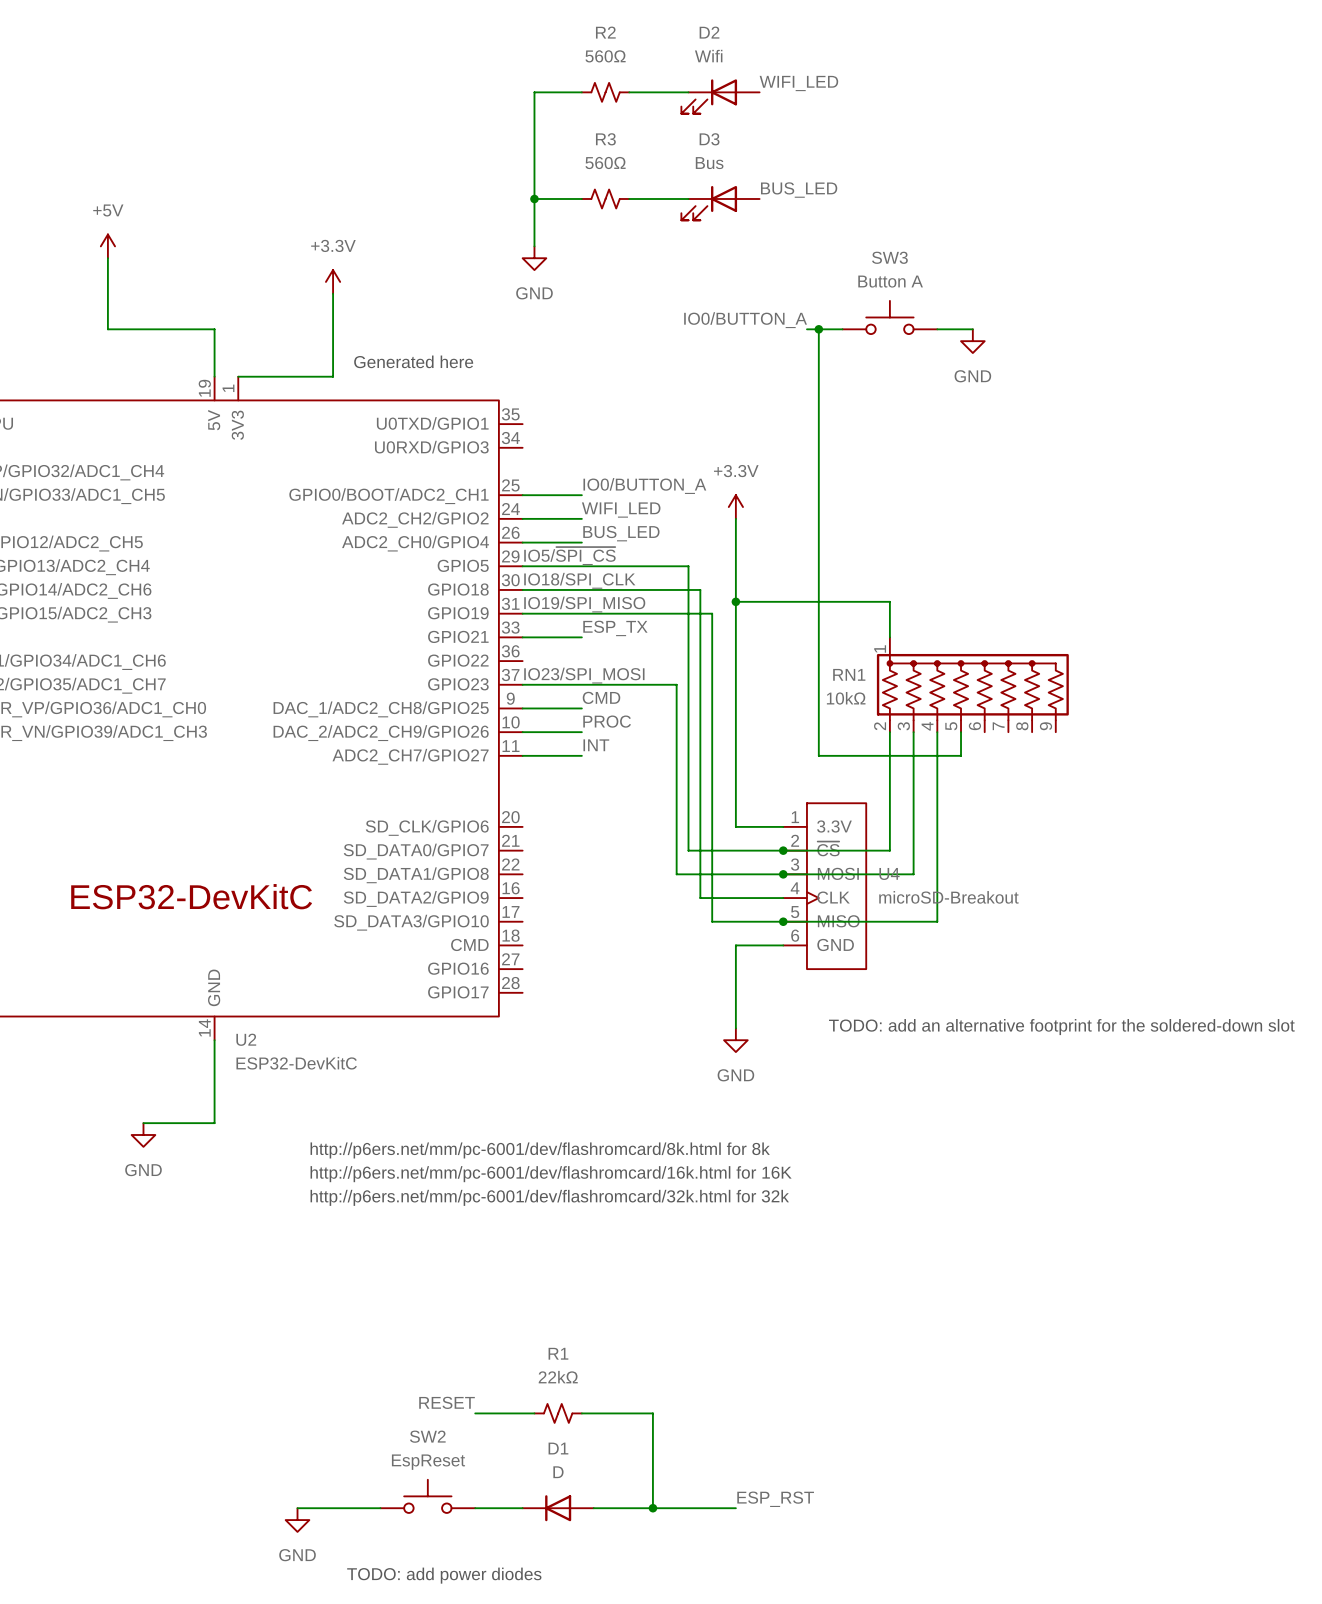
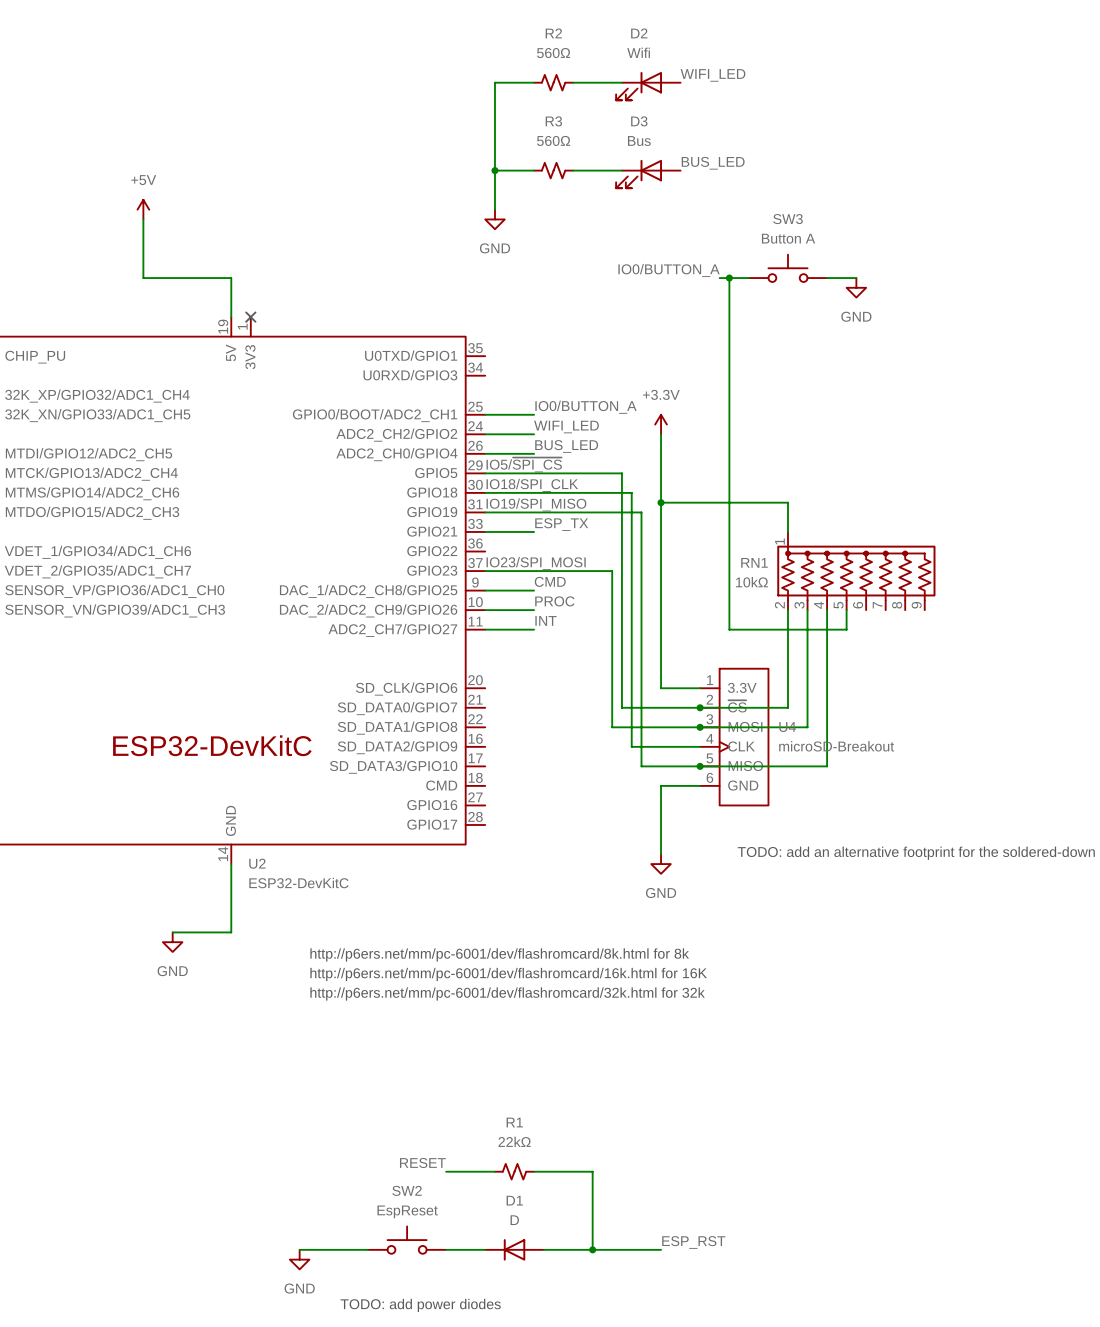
power symbol: +3.3V (333, 281) -> none
wire: (333, 293) (333, 376) (238, 376) -> none
text: Generated here (413, 361) -> none
no-connect mark: none -> (250, 317)

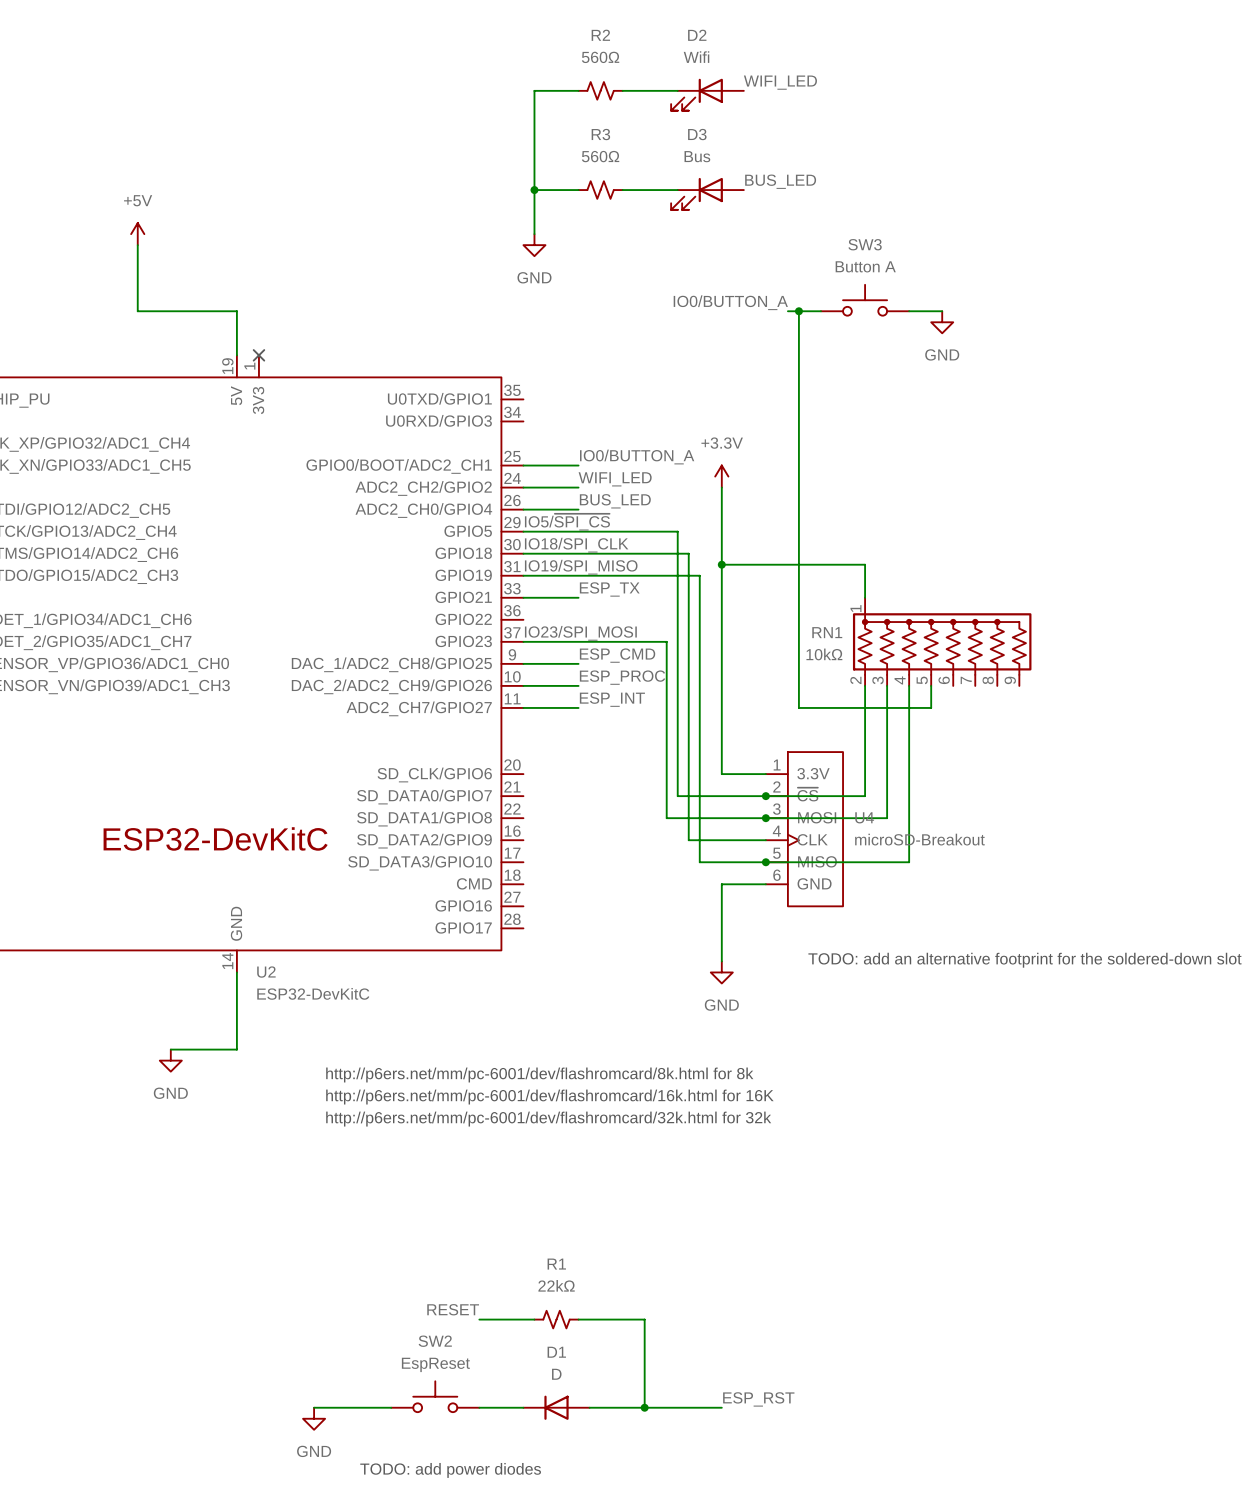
label: CMD (550, 581) -> ESP_CMD (617, 655)
label: PROC (554, 601) -> ESP_PROC (622, 677)
label: INT (545, 620) -> ESP_INT (612, 699)

